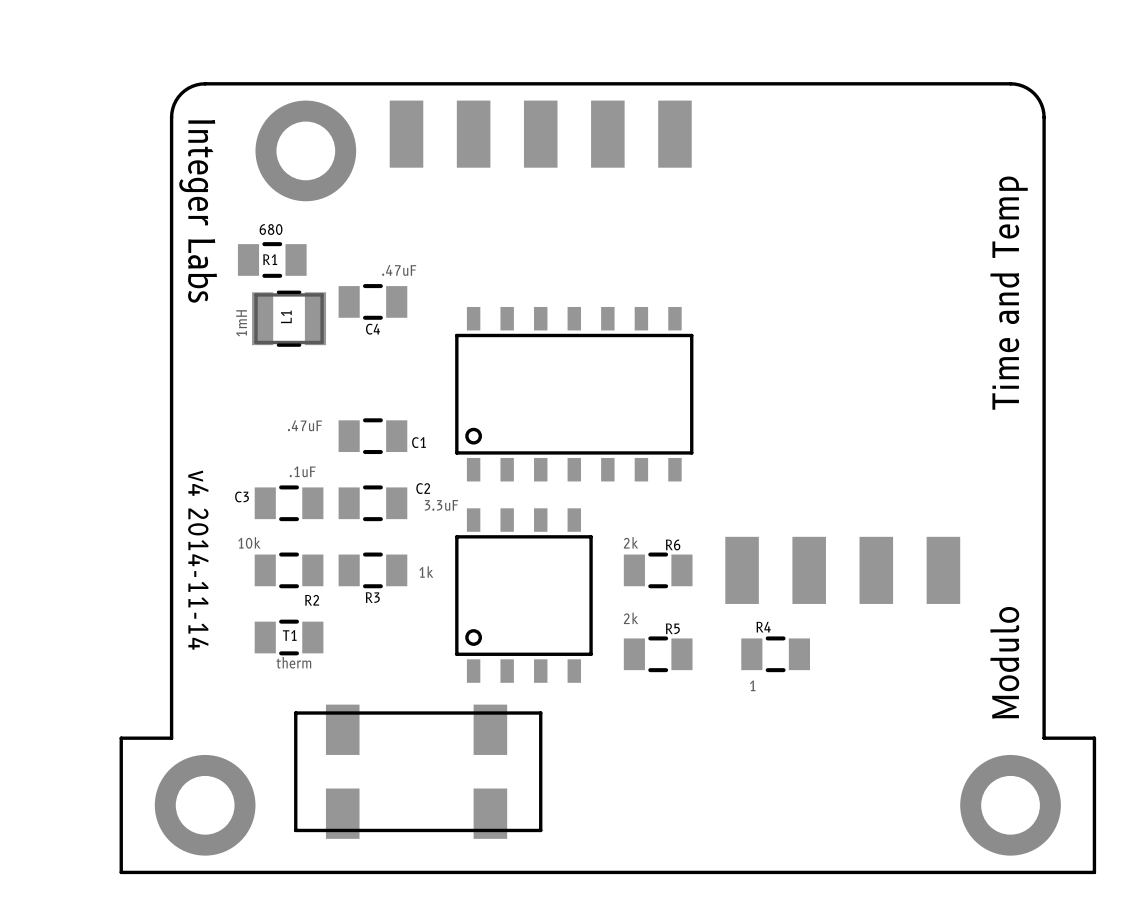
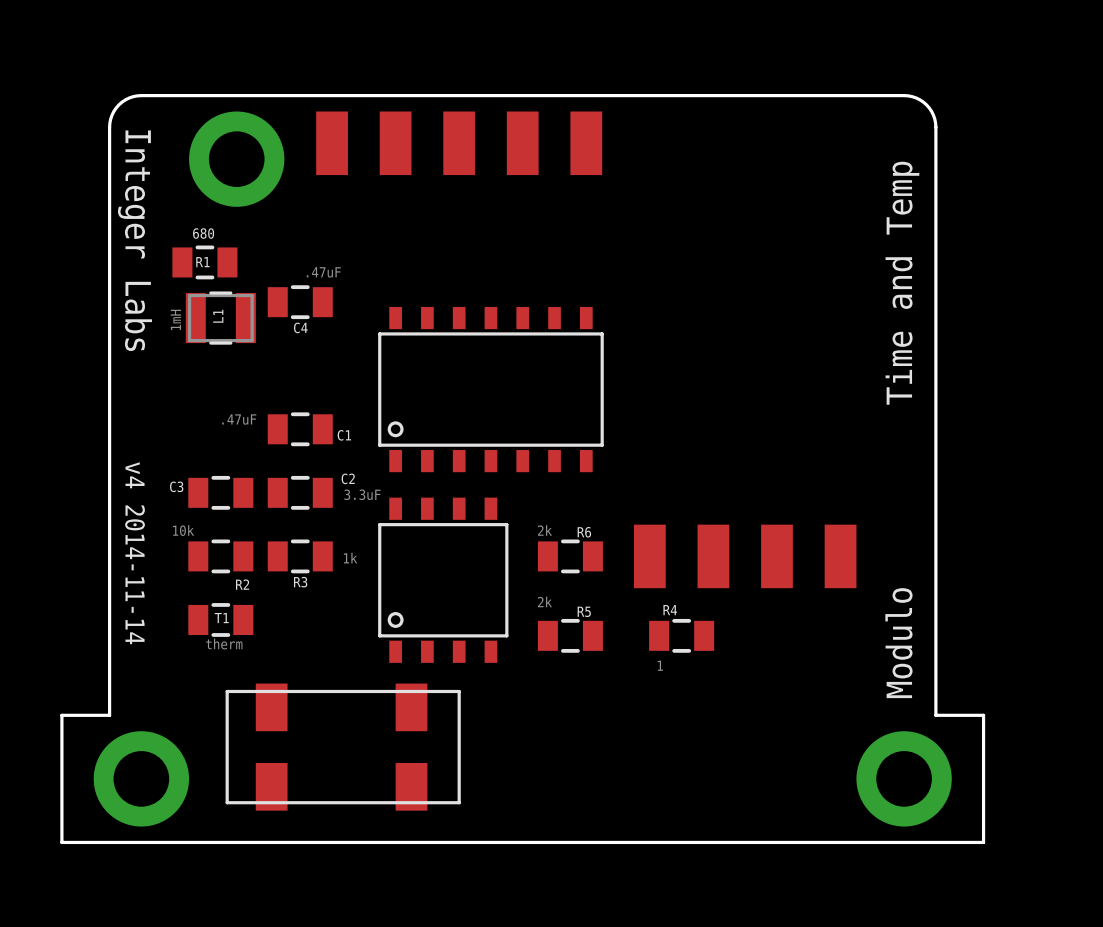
C3 value: .1uF (302, 471) -> none

